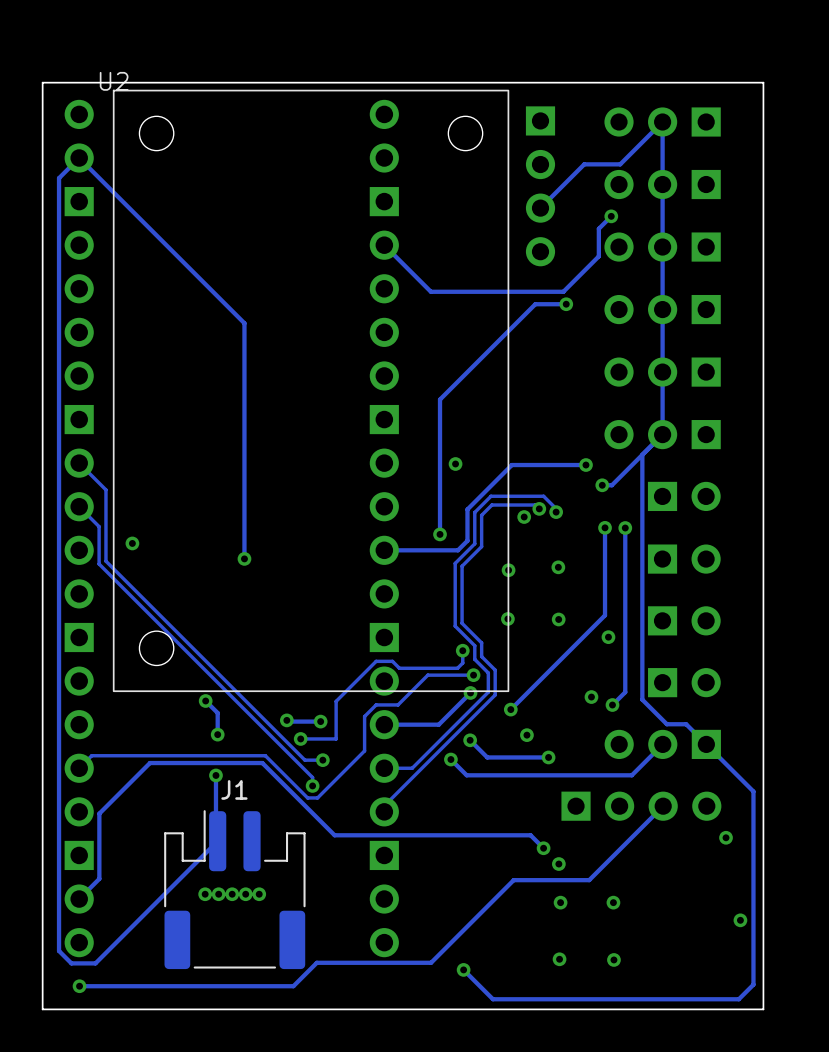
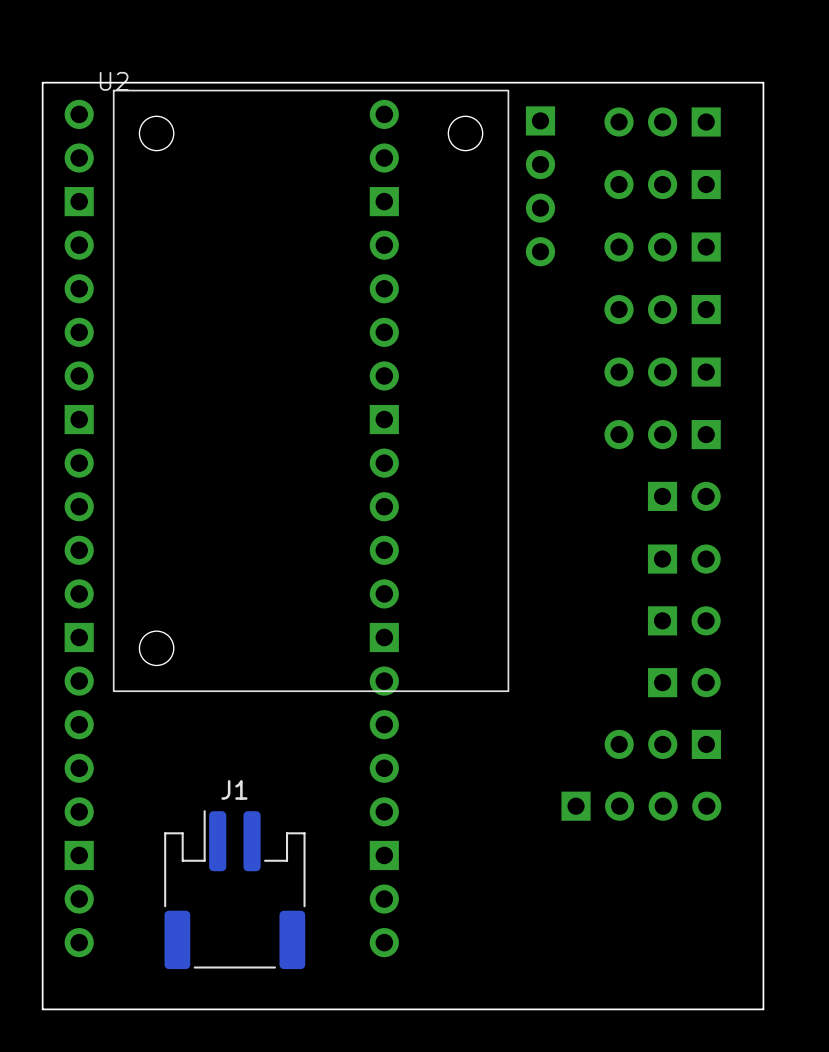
track: (540, 208) (584, 164) (620, 164) (662, 122) (662, 434) (611, 485) (602, 485) -> none
track: (611, 216) (598, 228) (598, 256) (563, 291) (430, 291) (384, 245) -> none
via: (611, 216) -> none
track: (566, 304) (535, 304) (440, 399) (440, 534) -> none
via: (566, 304) -> none
track: (642, 454) (642, 699) (666, 724) (686, 724) (753, 791) (753, 984) (738, 999) (492, 999) (463, 969) -> none
track: (79, 463) (105, 489) (105, 561) (304, 760) (322, 760) -> none
via: (455, 464) -> none
track: (585, 465) (511, 465) (467, 509) (467, 540) (457, 550) (384, 550) -> none
via: (585, 465) -> none
via: (602, 485) -> none
track: (79, 506) (99, 526) (99, 564) (312, 777) (312, 785) -> none
track: (539, 508) (535, 505) (491, 505) (481, 515) (481, 546) (462, 566) (462, 623) (481, 642) (481, 656) (495, 670) (495, 694) (384, 805) (384, 811) -> none
via: (539, 508) -> none
track: (556, 512) (556, 508) (543, 496) (490, 496) (474, 512) (474, 543) (455, 563) (455, 626) (474, 645) (474, 659) (488, 672) (488, 692) (412, 768) (384, 768) -> none
via: (556, 512) -> none
via: (524, 517) -> none
track: (605, 527) (605, 615) (510, 709) -> none
via: (605, 527) -> none
track: (625, 528) (625, 692) (612, 705) -> none
via: (625, 528) -> none
via: (440, 534) -> none
via: (132, 543) -> none
track: (244, 558) (244, 323) (79, 158) (59, 178) (59, 950) (71, 963) (95, 963) (217, 841) (215, 839) (215, 775) -> none
via: (244, 558) -> none
via: (558, 567) -> none
via: (508, 570) -> none
via: (507, 618) -> none
via: (558, 619) -> none
via: (608, 637) -> none
track: (462, 650) (462, 663) (457, 668) (399, 668) (392, 661) (376, 661) (336, 701) (336, 738) (300, 738) -> none
via: (462, 650) -> none
track: (473, 675) (427, 675) (398, 704) (376, 704) (364, 716) (364, 750) (317, 797) (307, 797) (265, 755) (91, 755) (79, 768) -> none
via: (473, 675) -> none
track: (470, 692) (438, 724) (384, 724) -> none
via: (470, 692) -> none
via: (591, 697) -> none
track: (205, 701) (217, 713) (217, 734) -> none
via: (205, 701) -> none
via: (612, 705) -> none
via: (510, 709) -> none
track: (286, 720) (320, 721) -> none
via: (286, 720) -> none
via: (320, 721) -> none
via: (217, 734) -> none
via: (526, 735) -> none
via: (300, 738) -> none
track: (470, 740) (487, 757) (548, 757) -> none
via: (470, 740) -> none
track: (662, 744) (631, 775) (466, 775) (450, 759) -> none
via: (548, 757) -> none
via: (450, 759) -> none
via: (322, 760) -> none
via: (215, 775) -> none
via: (312, 785) -> none
track: (663, 806) (589, 880) (513, 880) (431, 962) (316, 962) (293, 986) (79, 986) -> none
via: (726, 837) -> none
track: (543, 848) (530, 835) (334, 835) (262, 763) (149, 763) (99, 813) (99, 878) (79, 899) -> none
via: (543, 848) -> none
via: (558, 864) -> none
via: (205, 894) -> none
via: (218, 894) -> none
via: (232, 894) -> none
via: (245, 894) -> none
via: (259, 894) -> none
via: (560, 902) -> none
via: (613, 902) -> none
via: (740, 920) -> none
via: (559, 959) -> none
via: (613, 959) -> none
via: (463, 969) -> none
via: (79, 986) -> none

